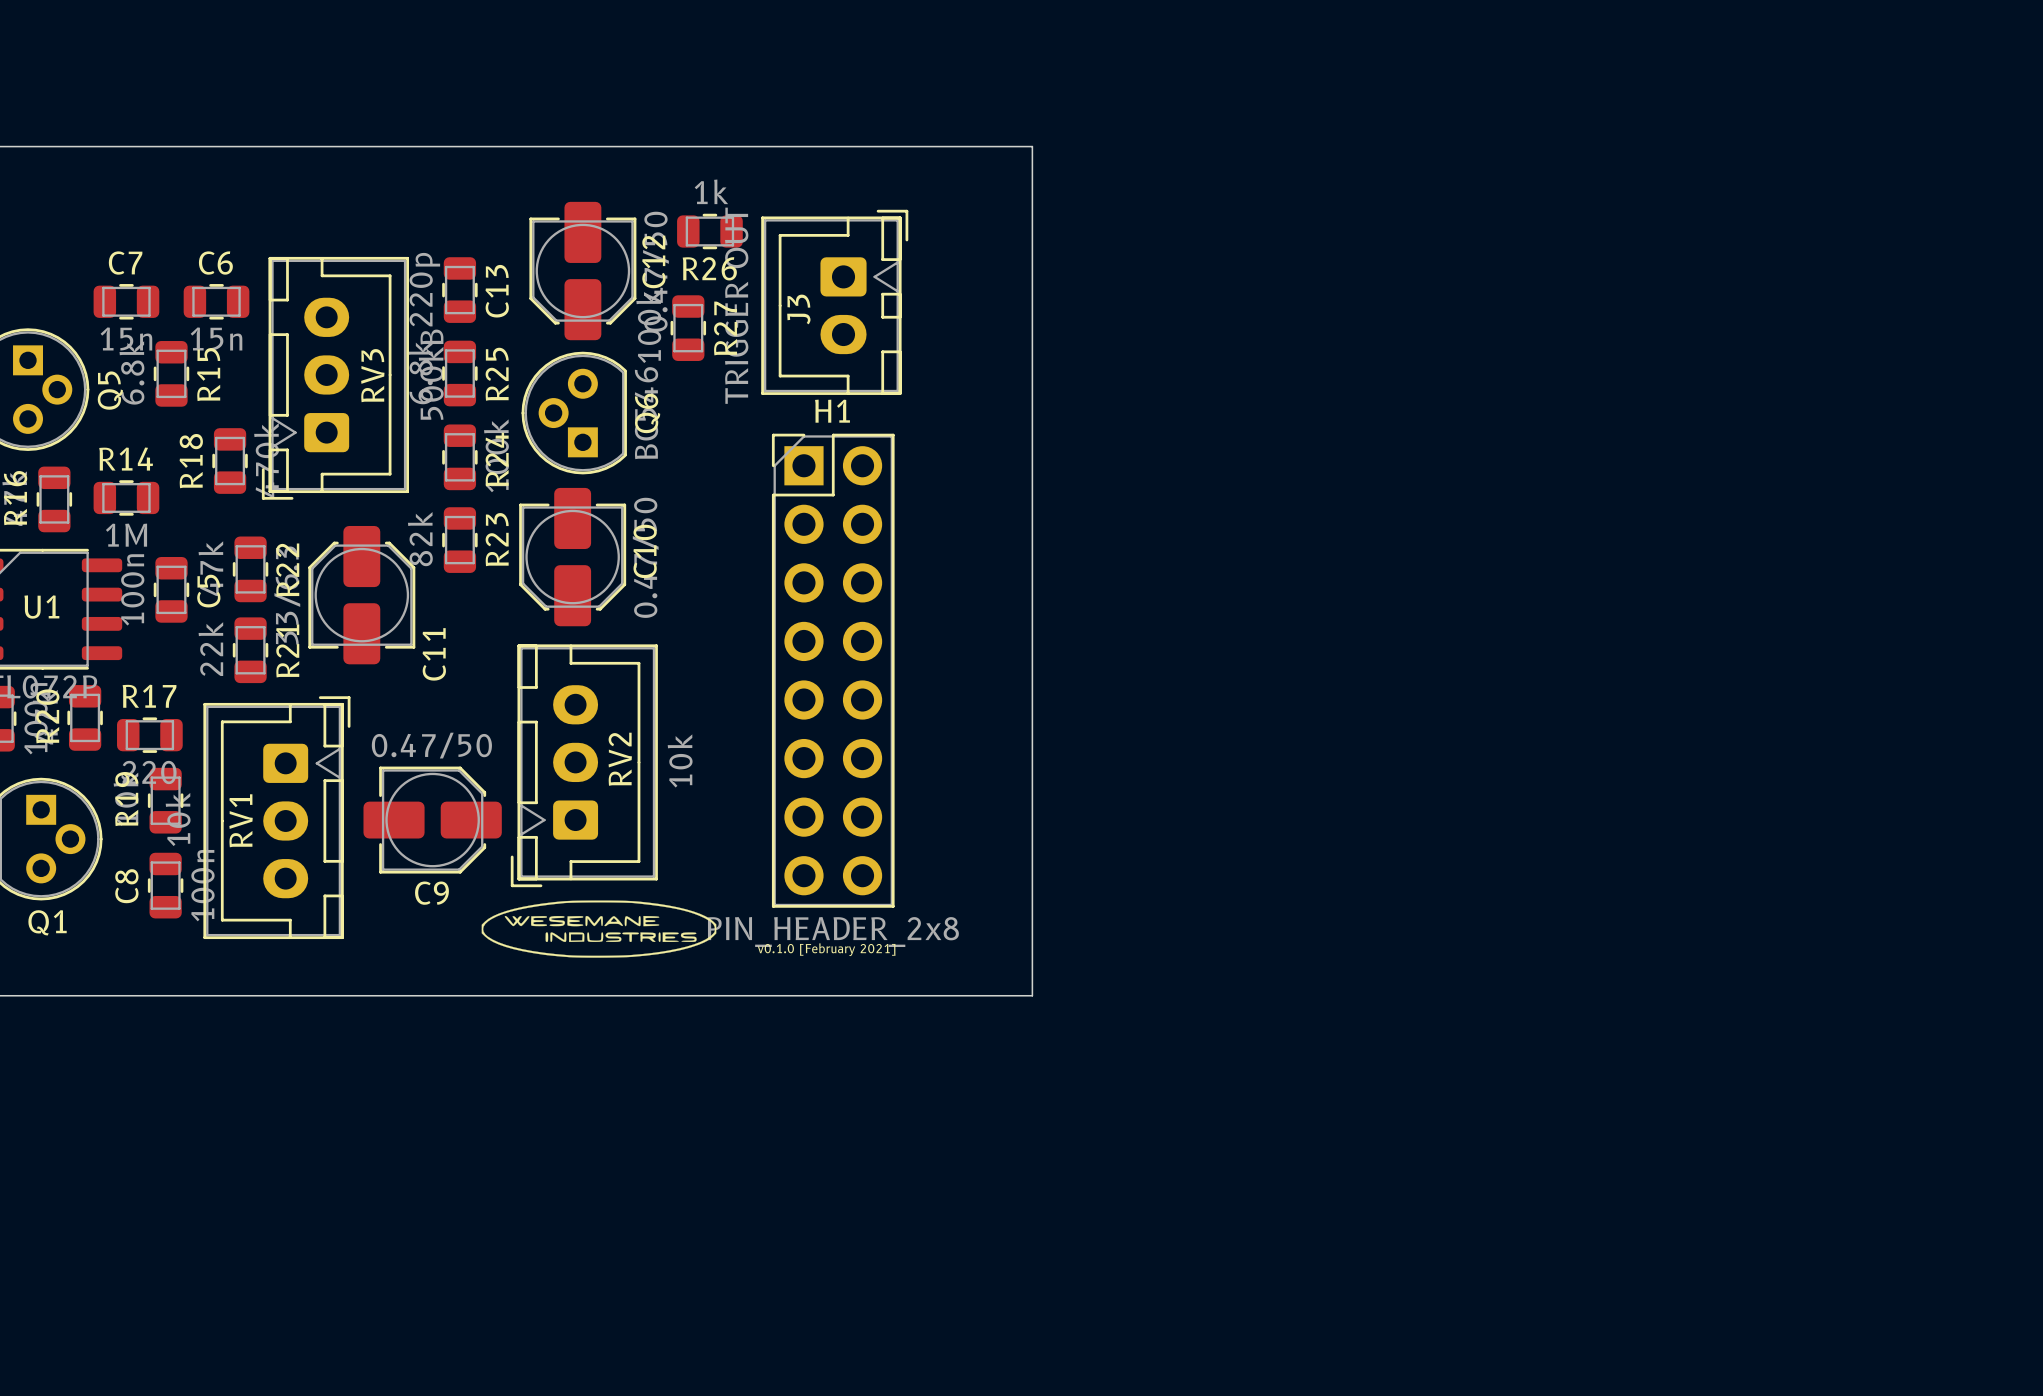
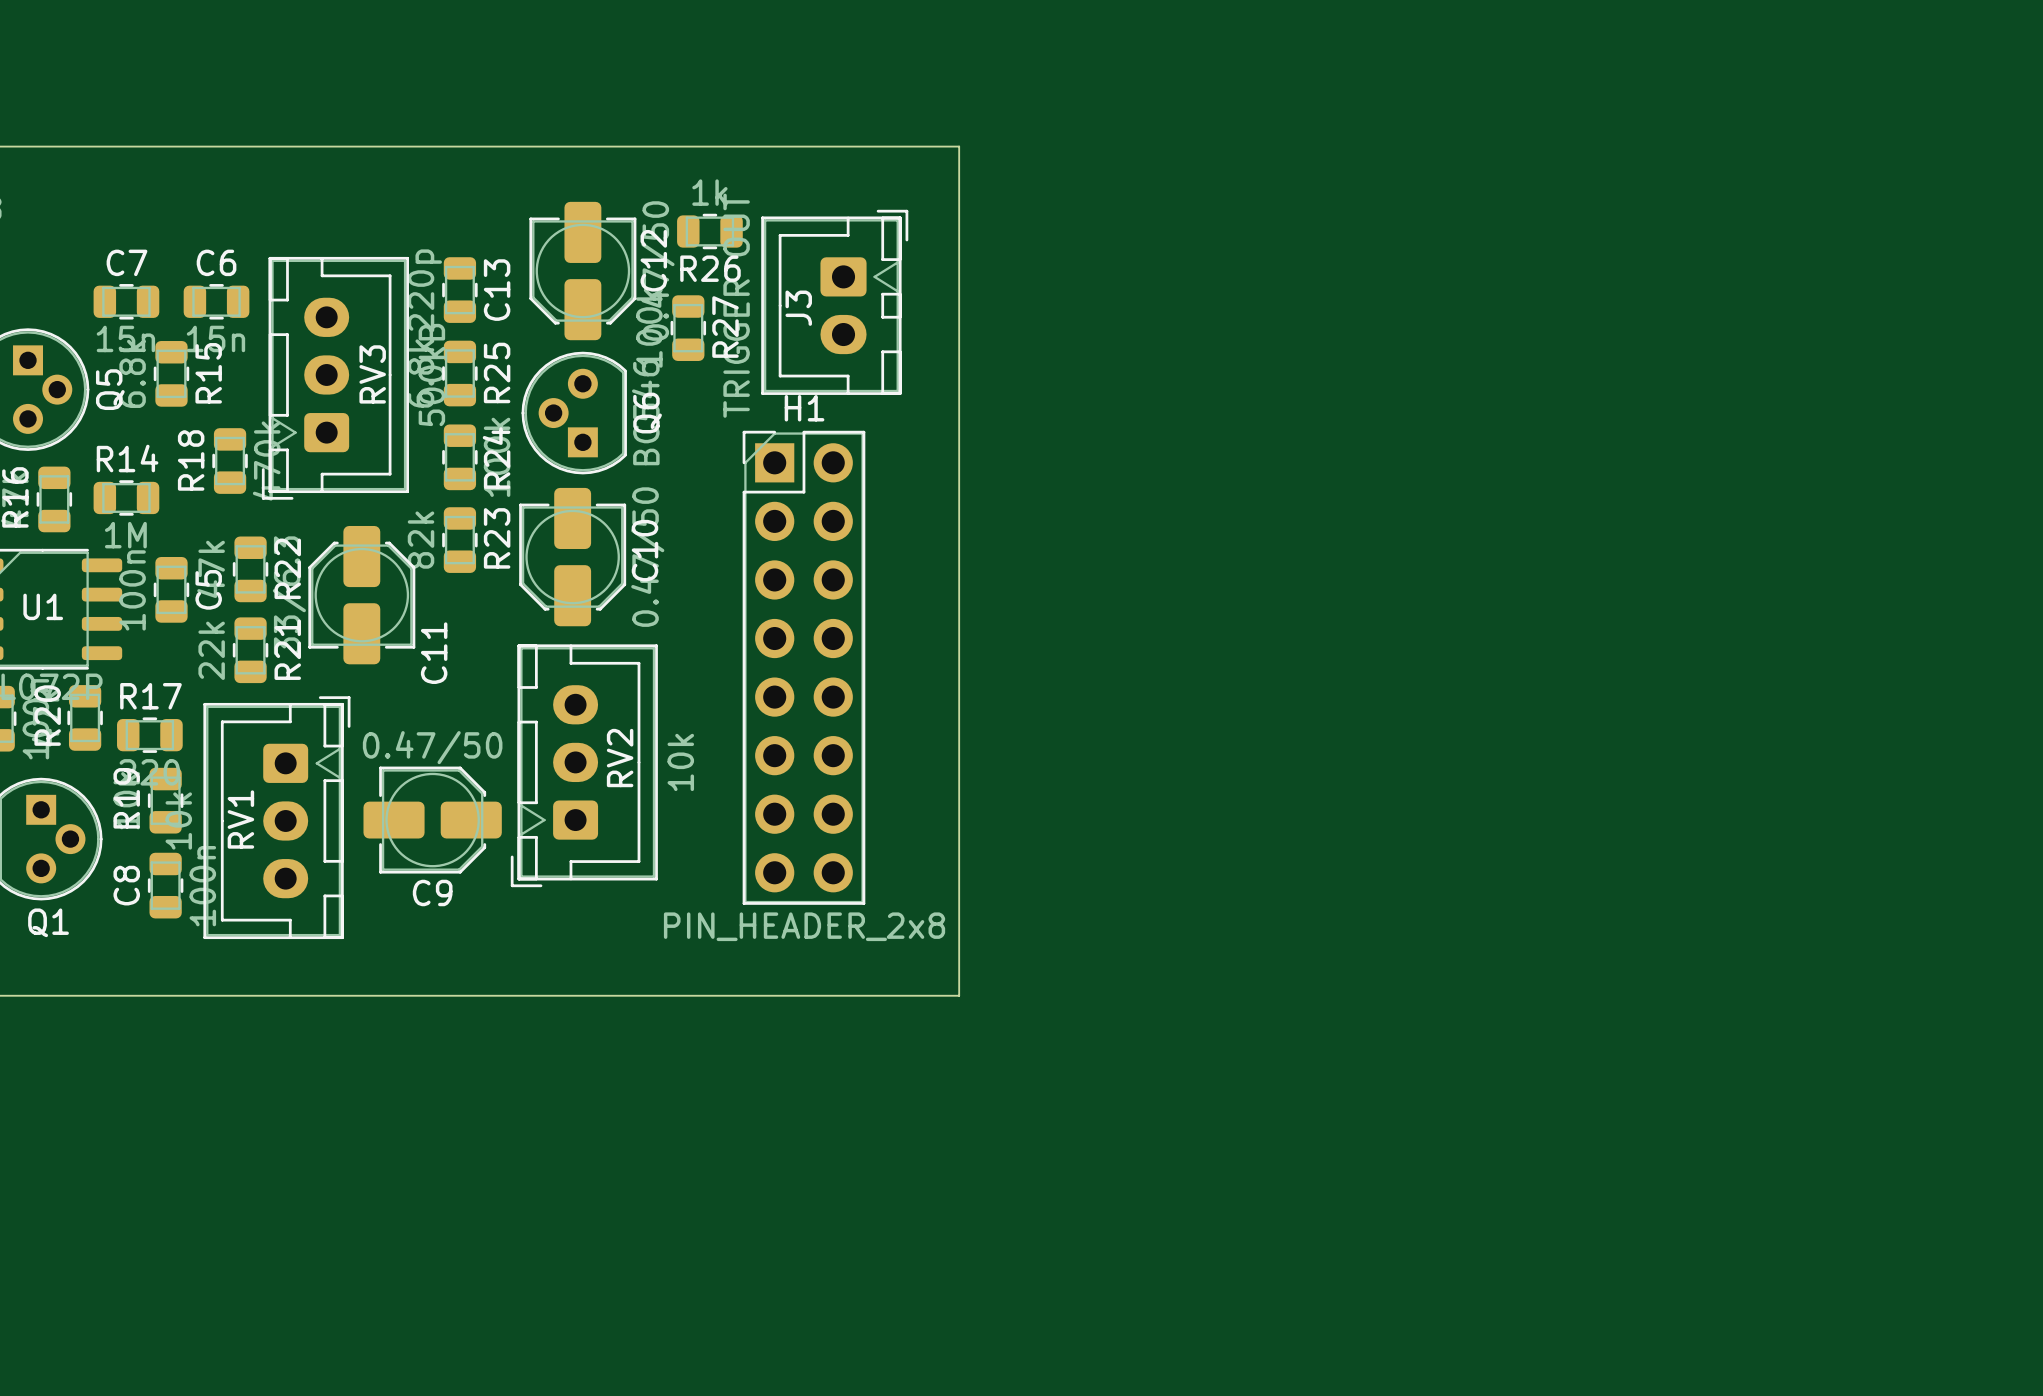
board edge: (959, 146) (1032, 146) (1032, 995) (959, 995) -> (959, 146) (959, 995)
H1 position: (833, 670) -> (803, 667)
drawing: [481, 900, 717, 958] -> none
text: v0.1.0 [February 2021] (826, 949) -> none

